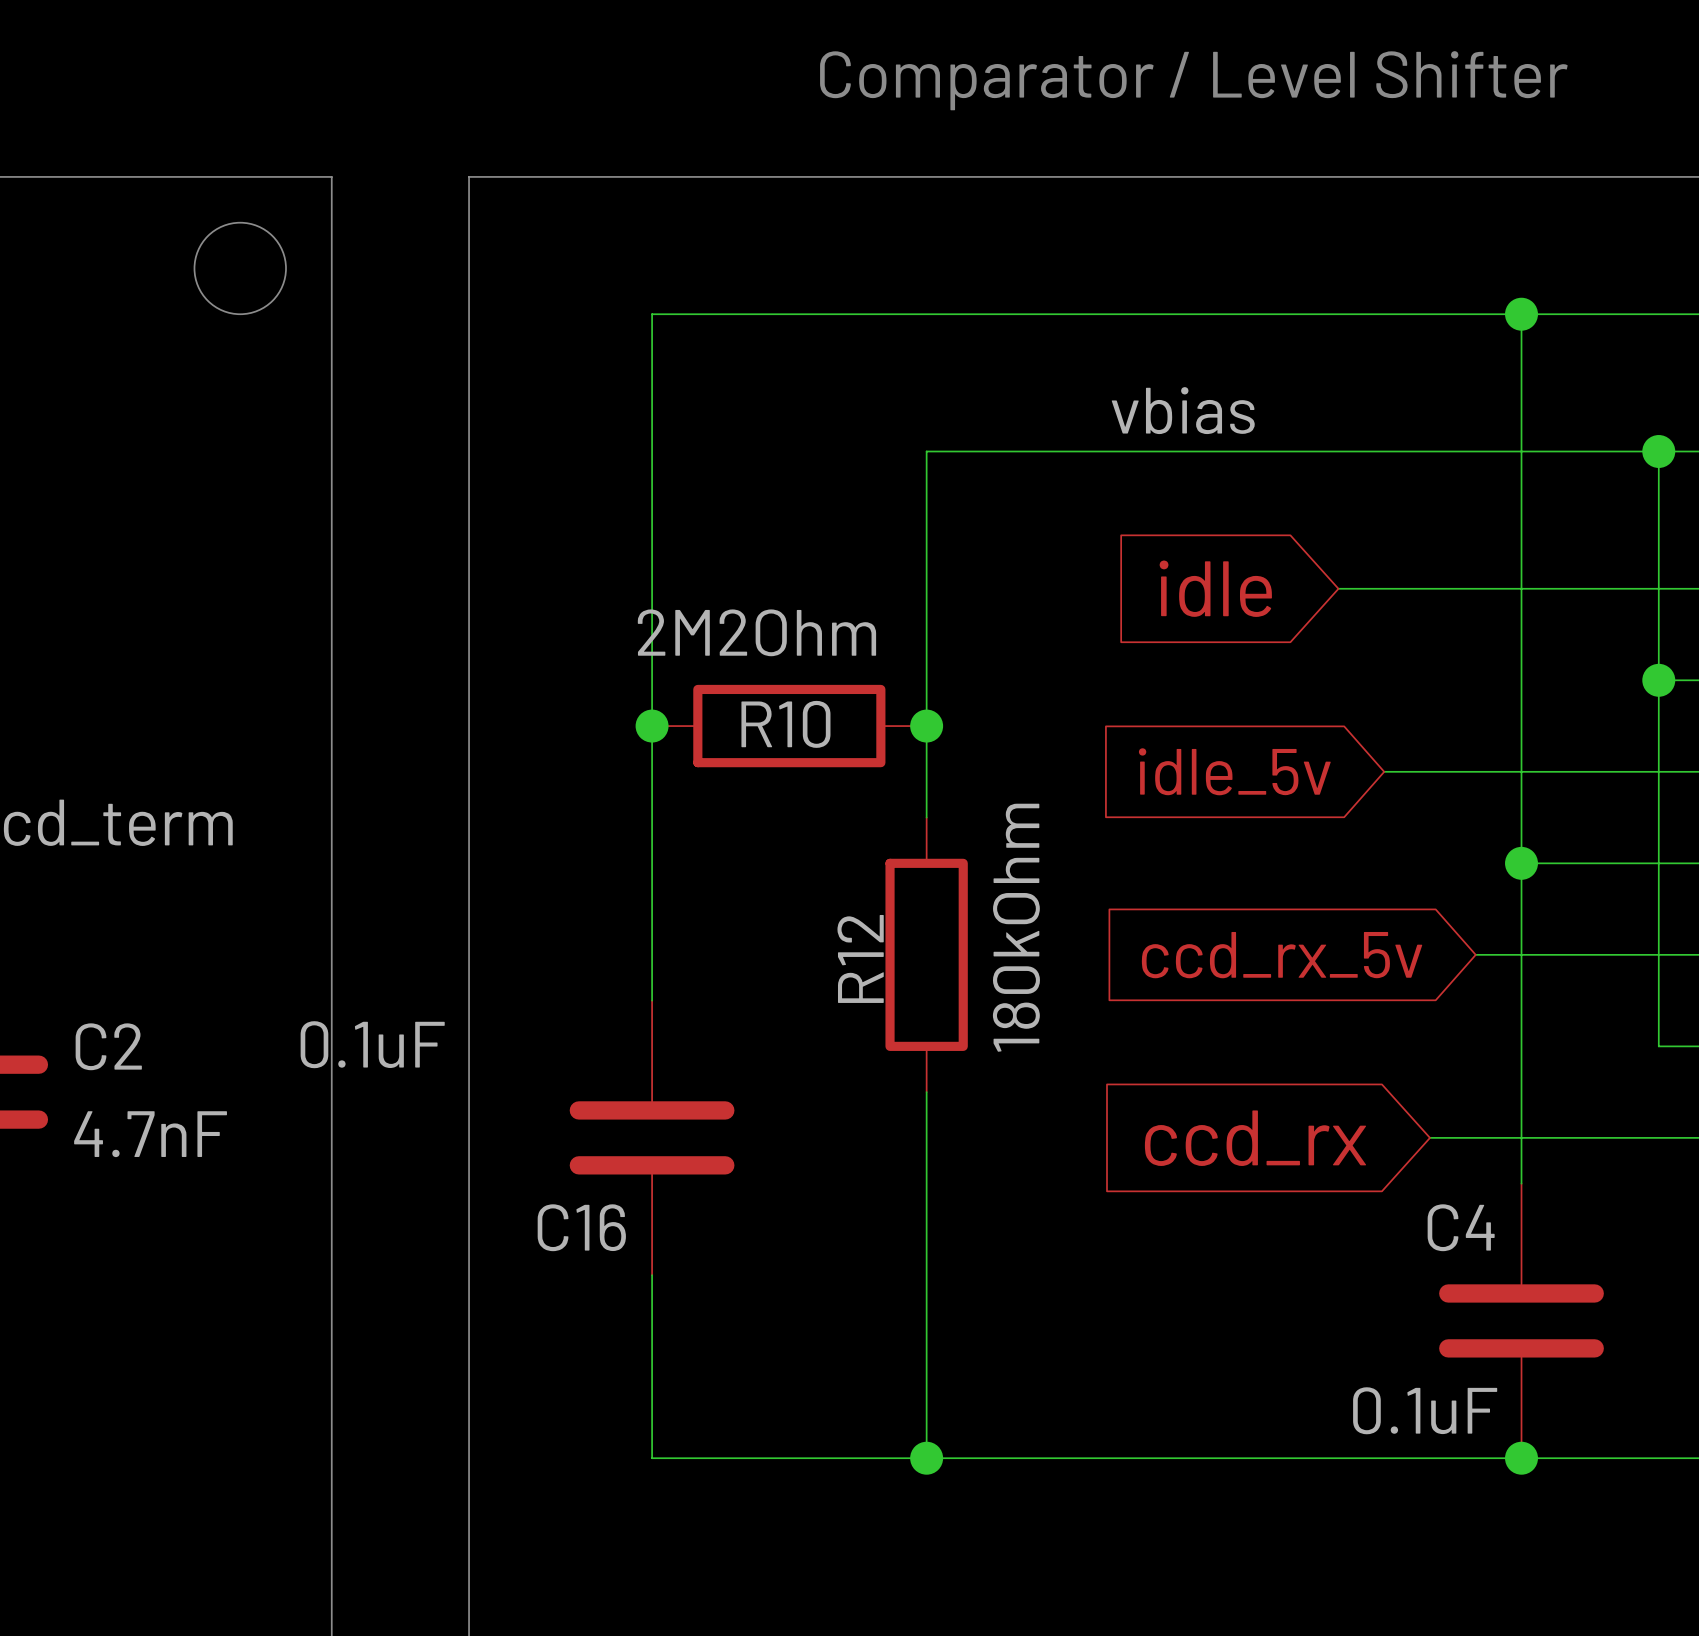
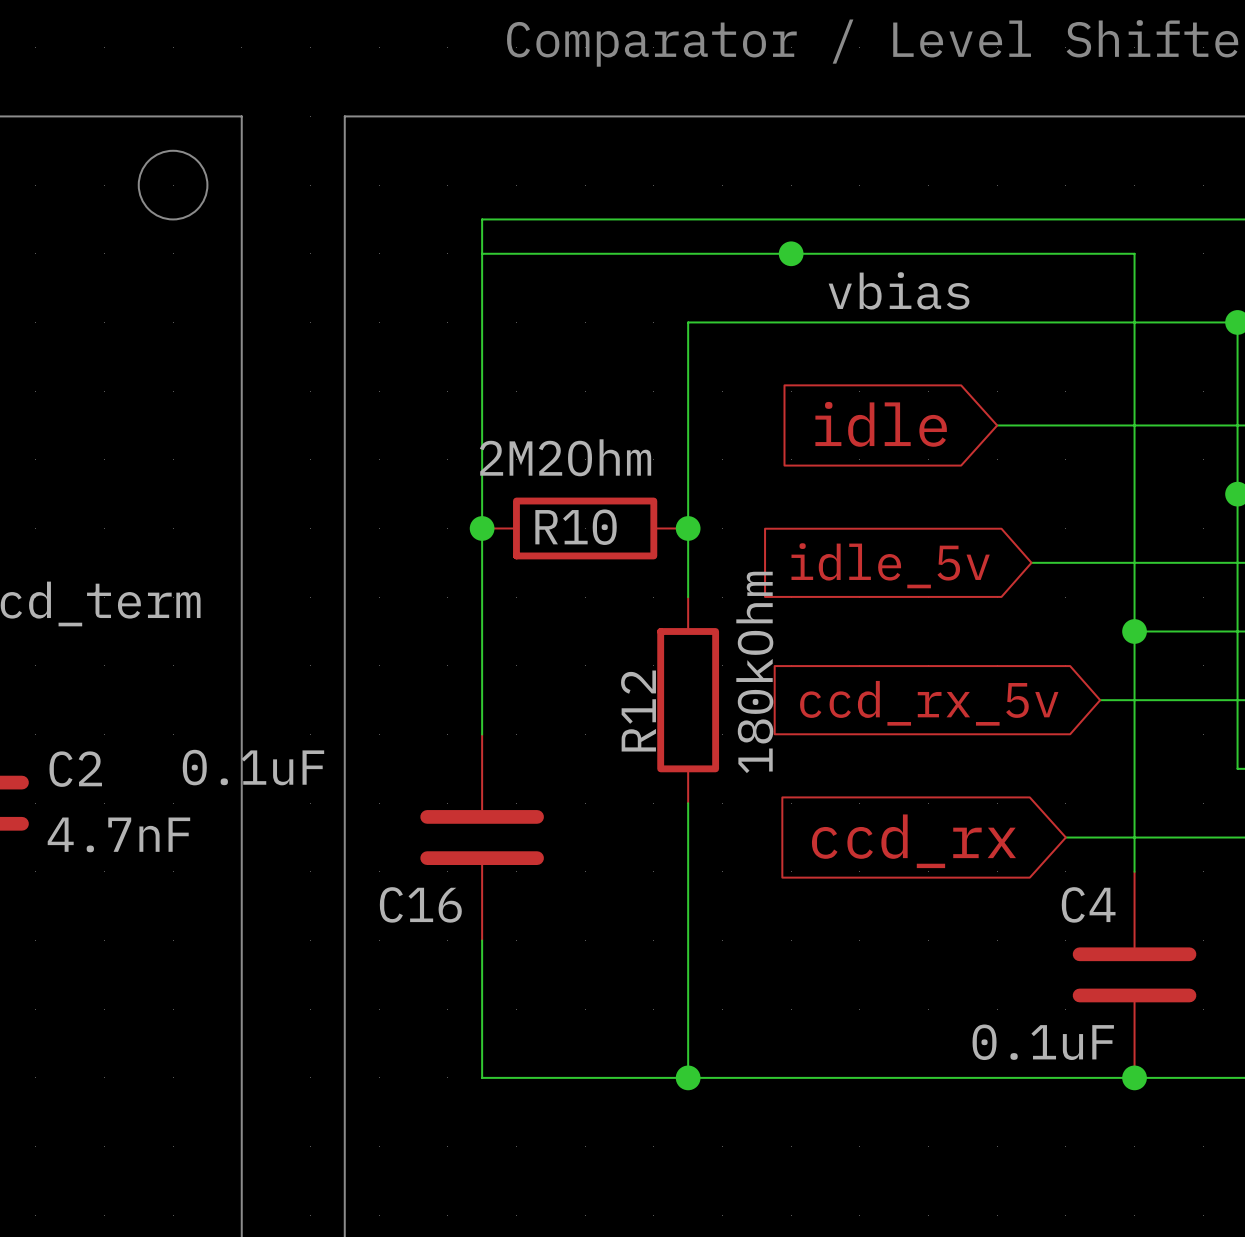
wire: (1521, 314) (1521, 359) -> (482, 253) (1134, 253)
junction: (1521, 314) -> none
junction: none -> (791, 253)

